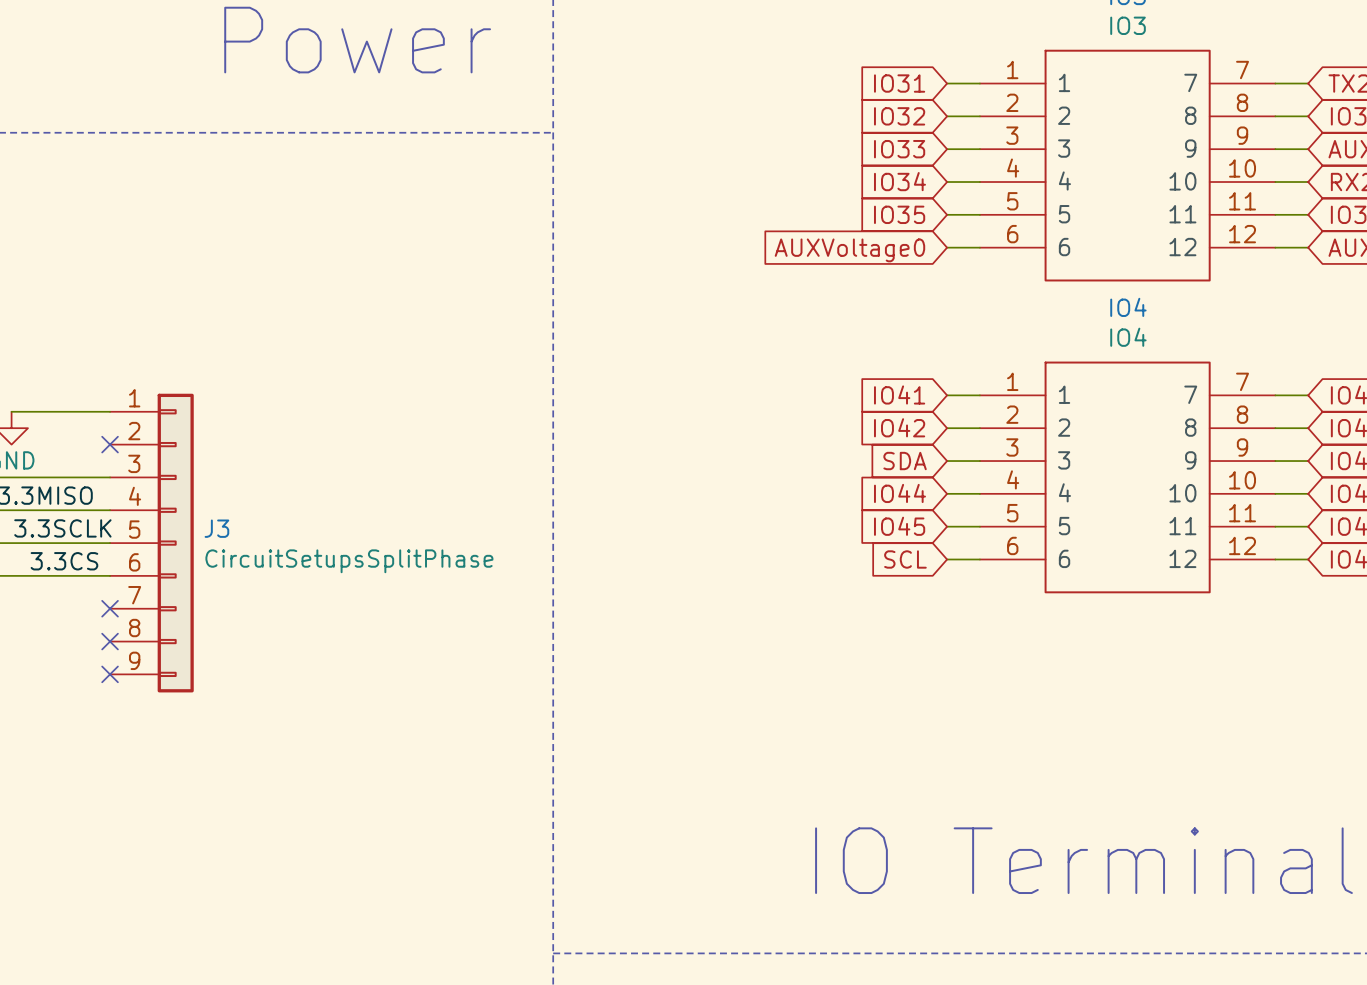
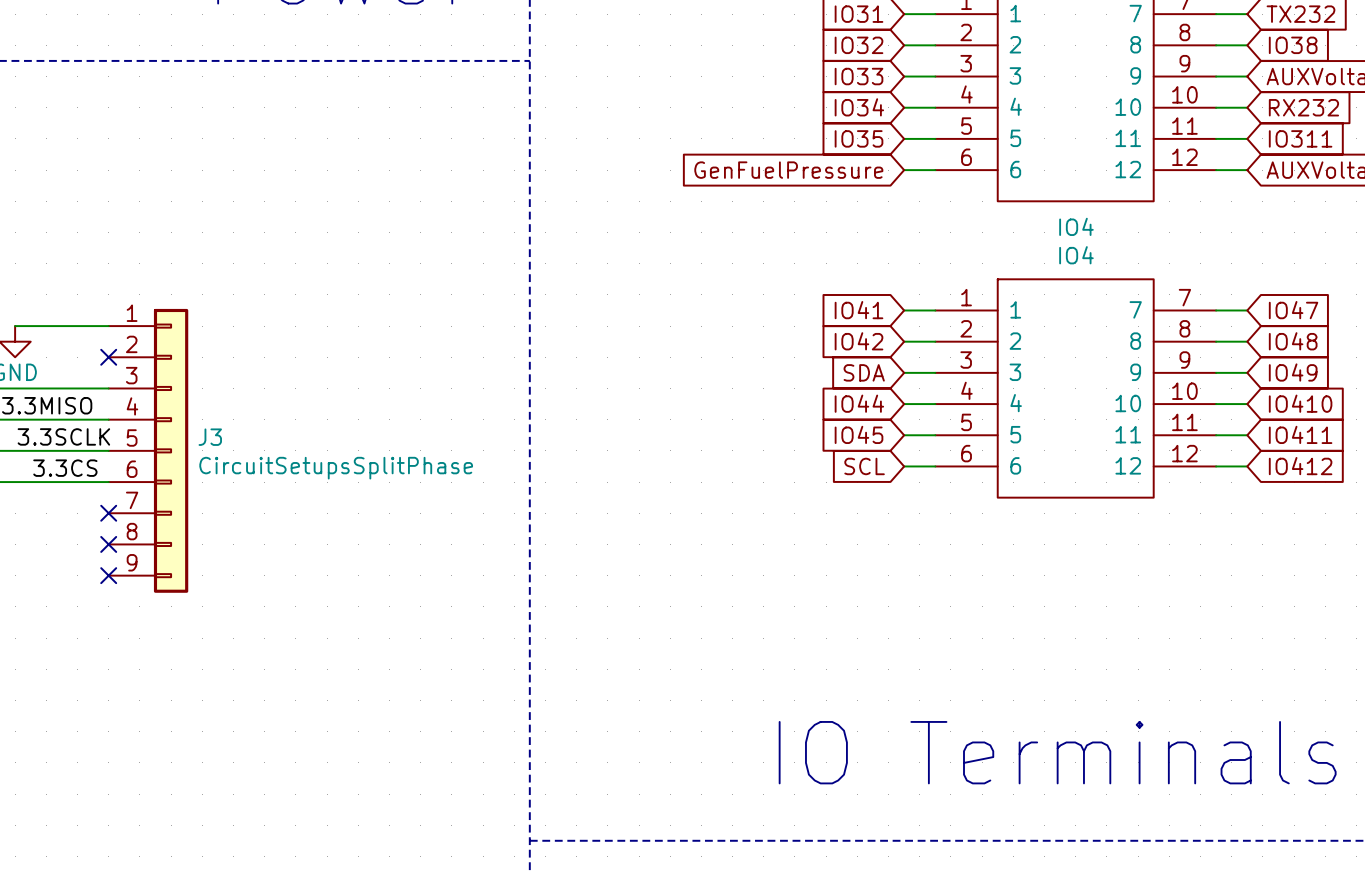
global label: AUXVoltage0 (849, 250) -> GenFuelPressure (788, 170)

